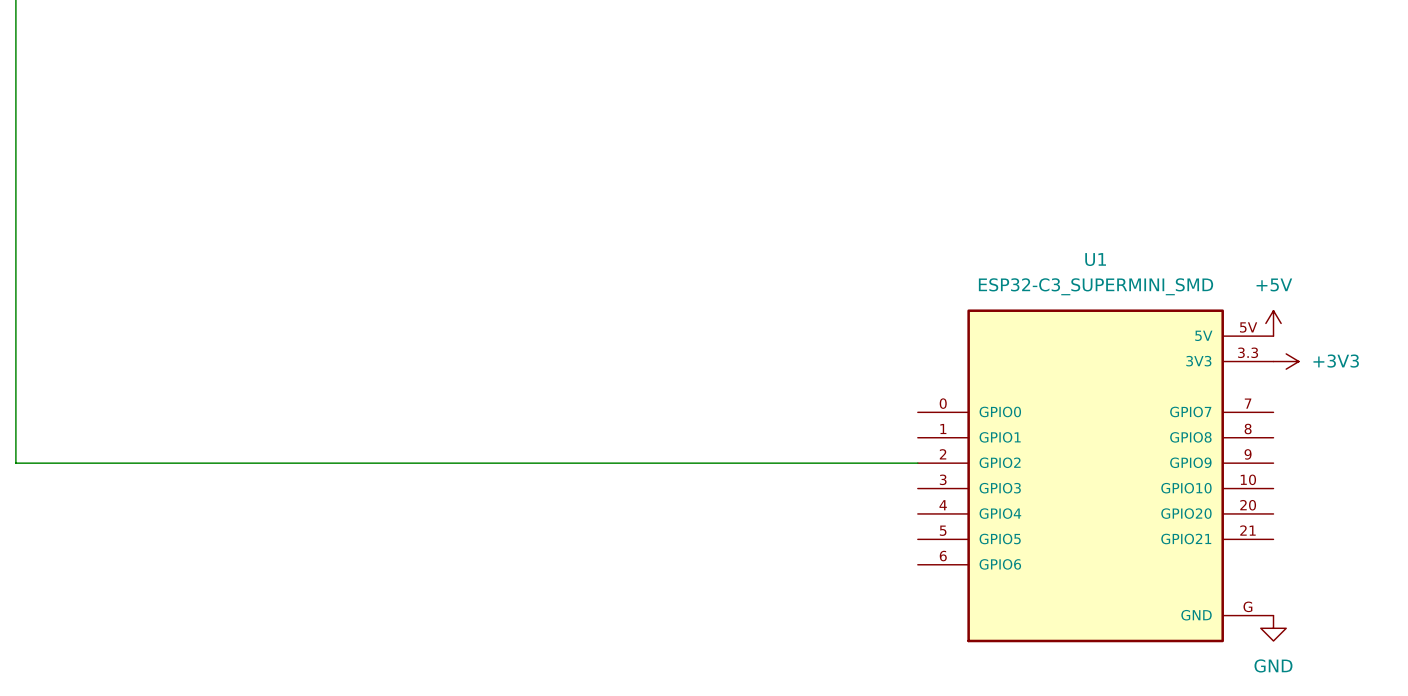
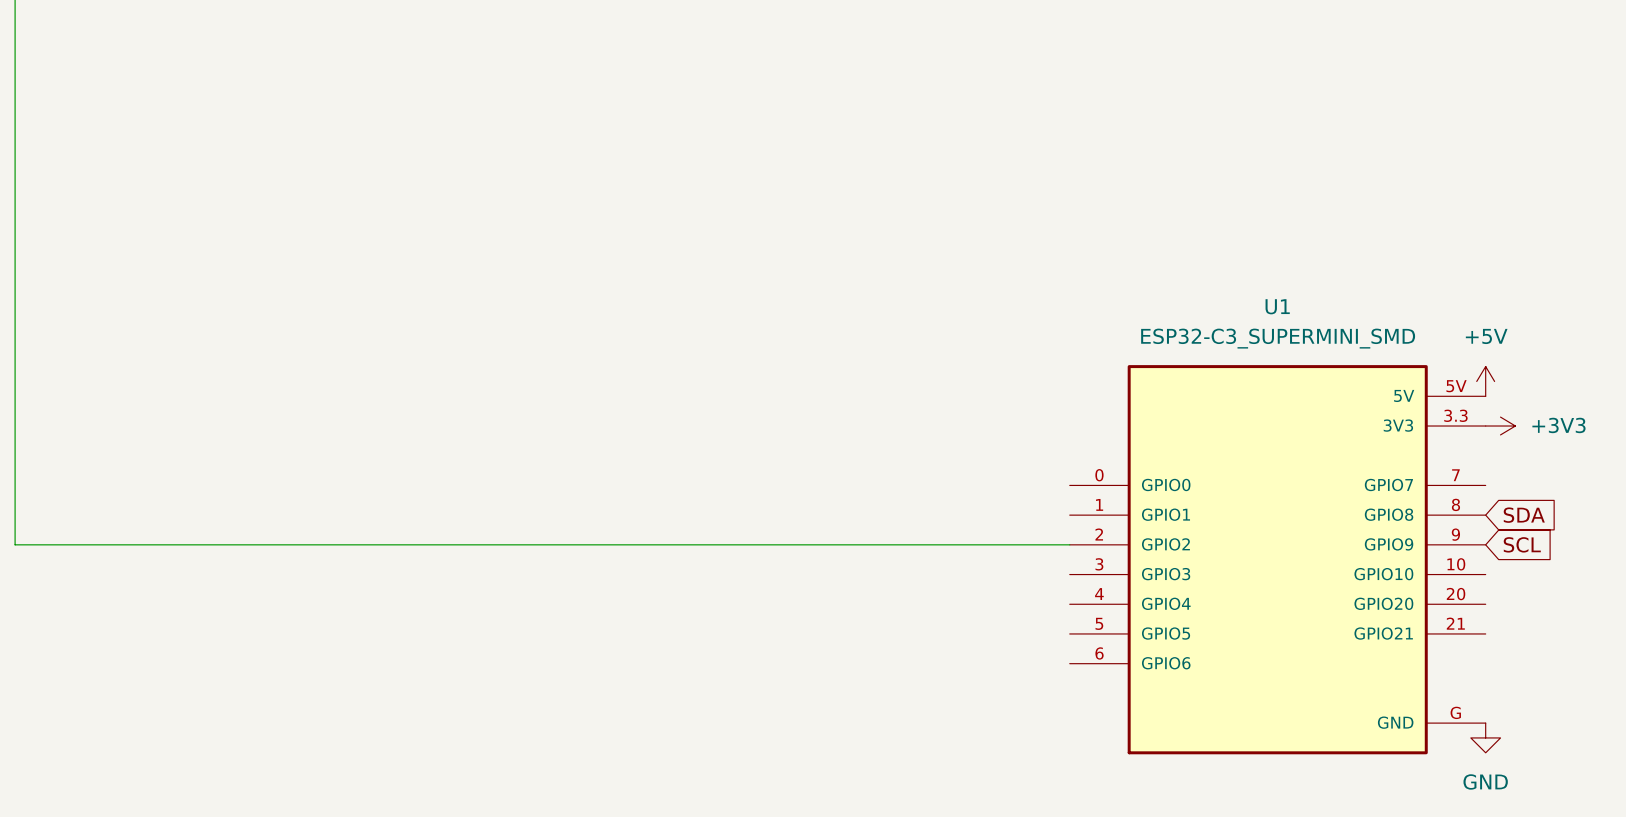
global label: none -> SDA (1524, 515)
global label: none -> SCL (1522, 544)

